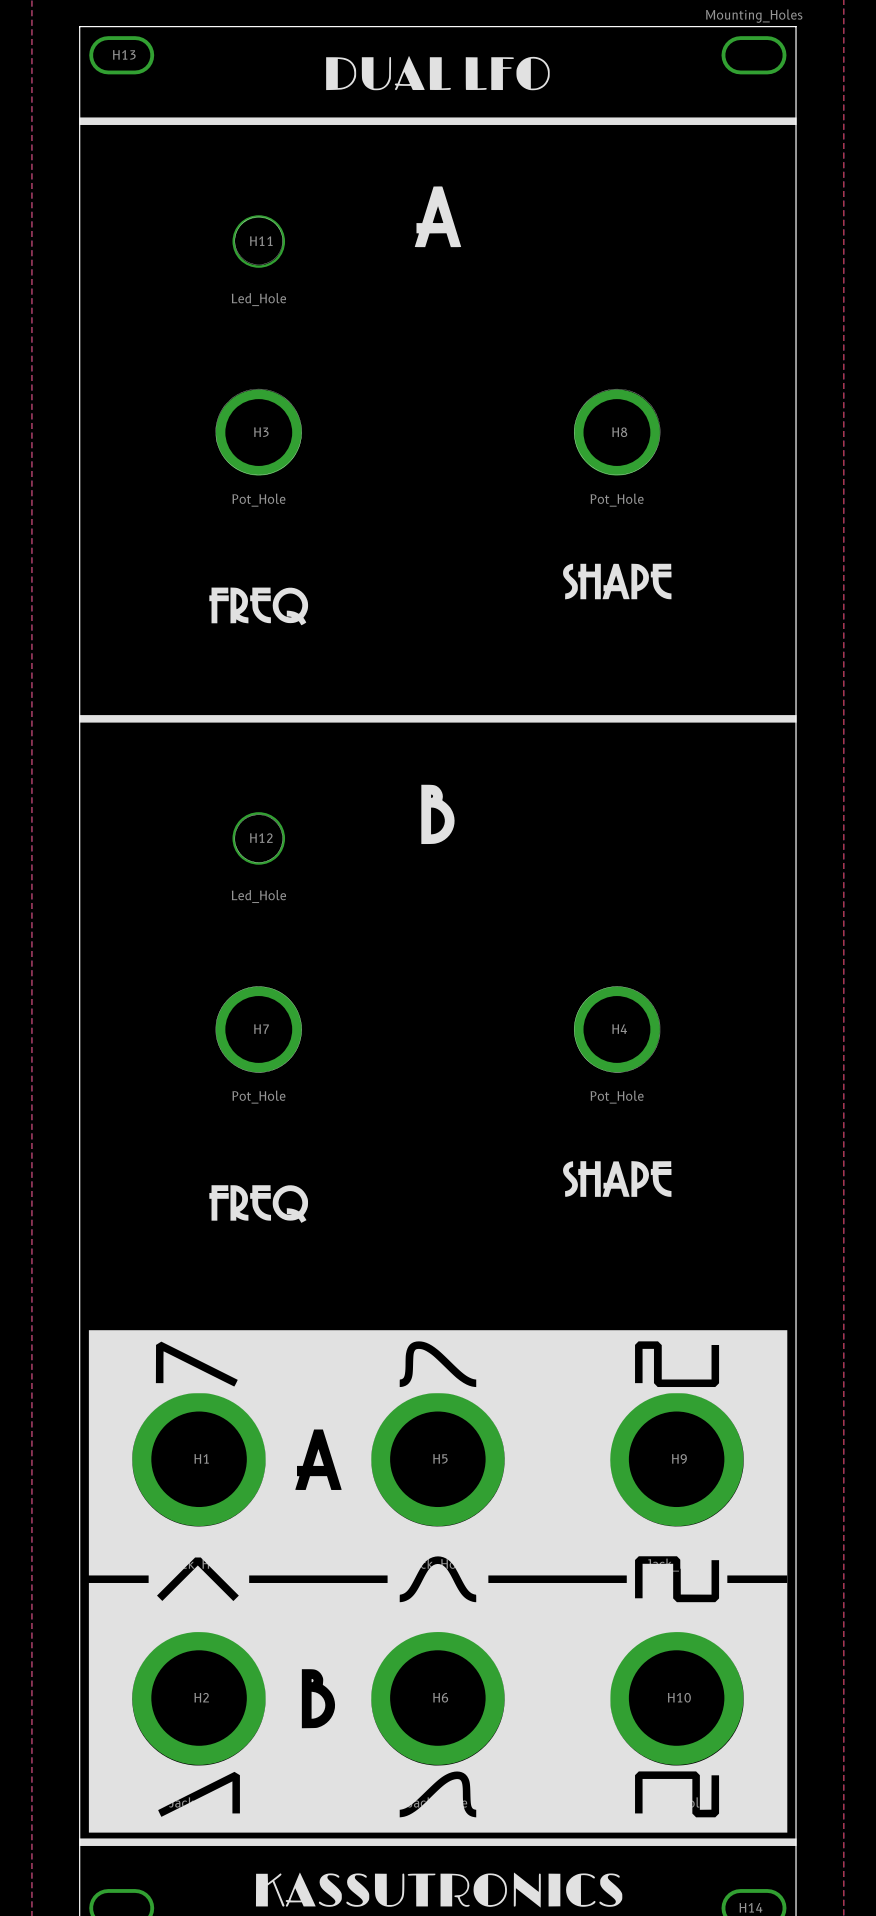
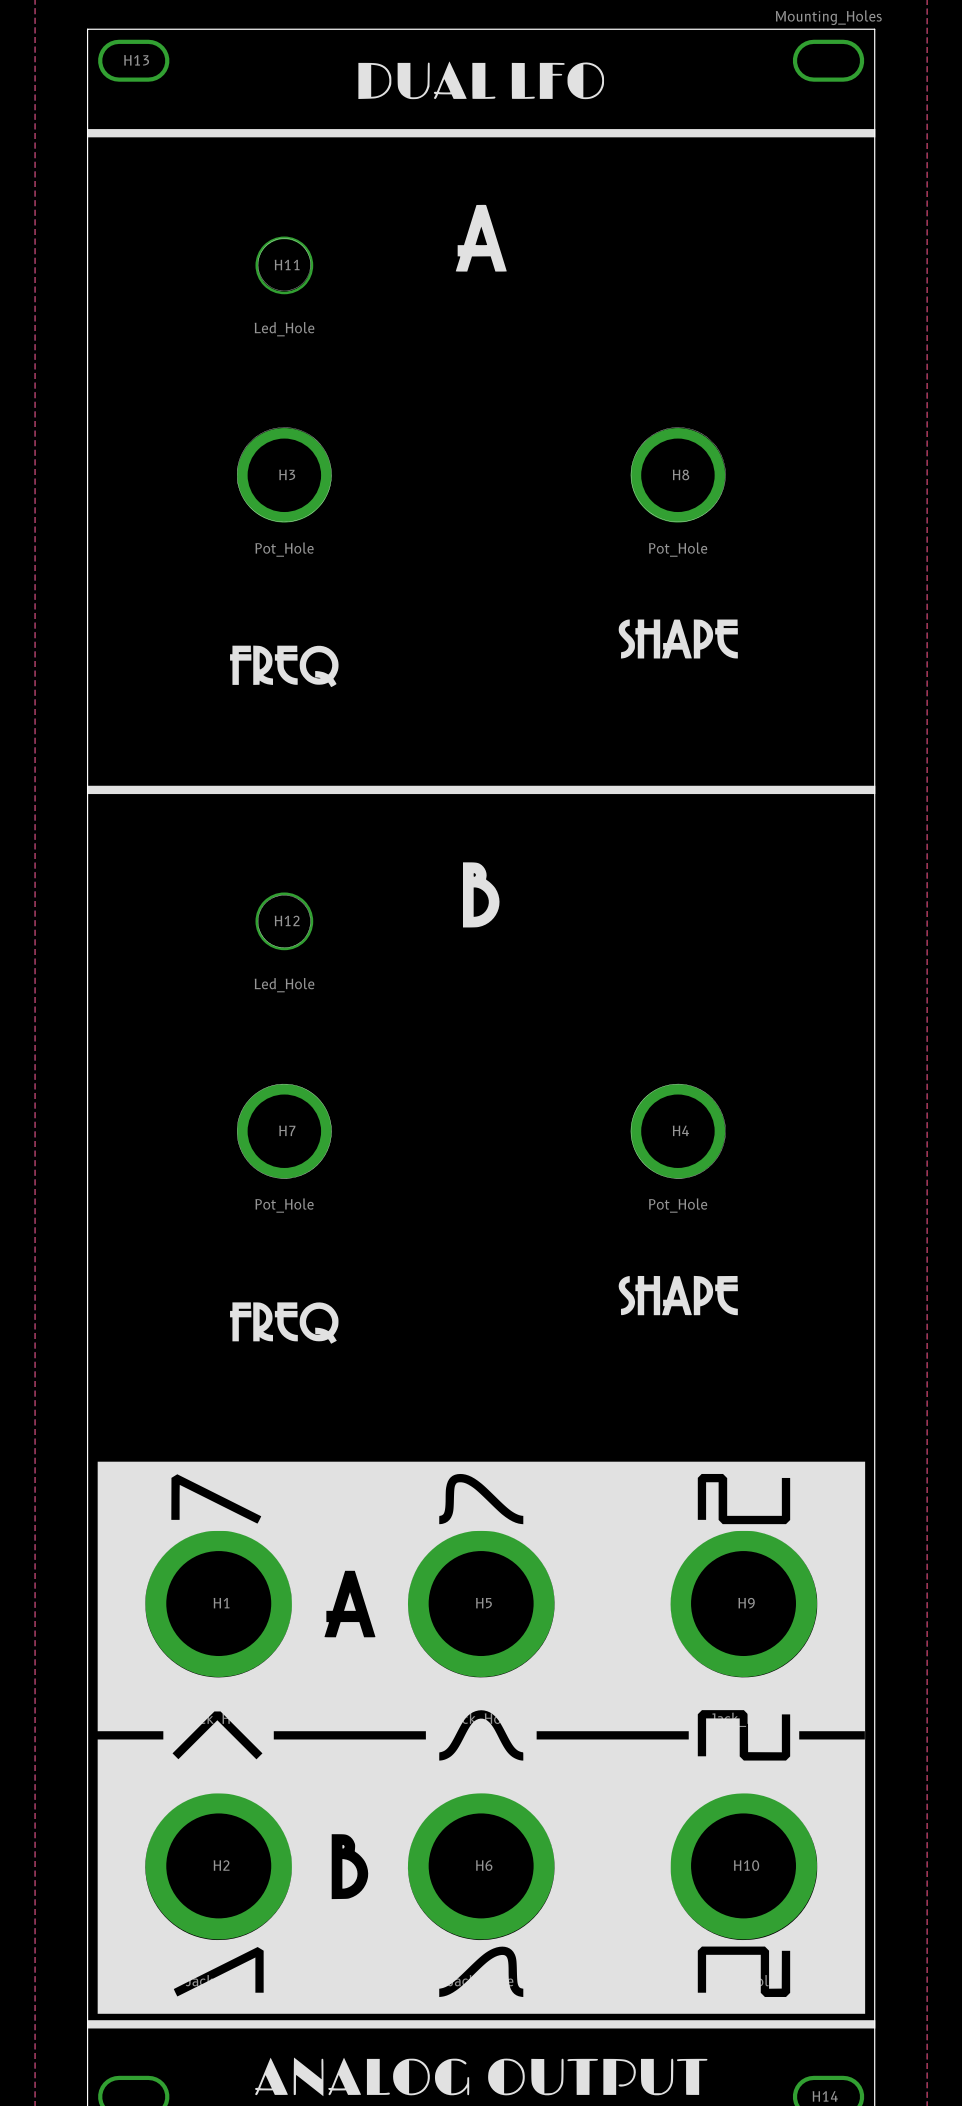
drawing shape: [79, 55, 797, 1908] -> [87, 61, 876, 2097]

